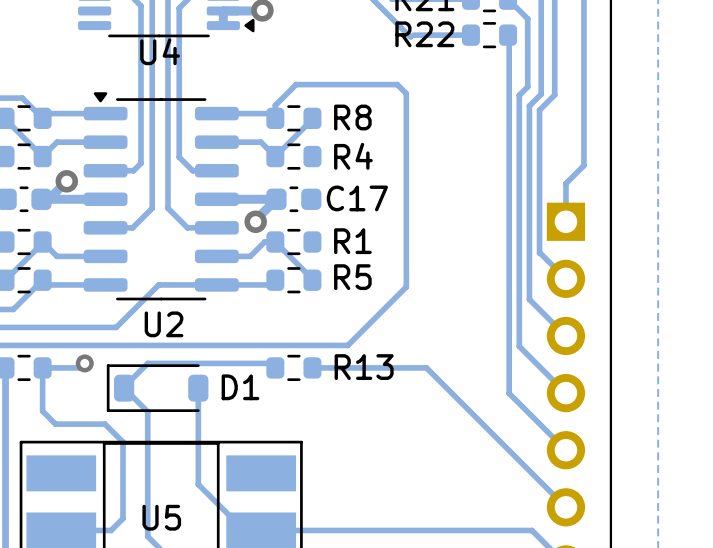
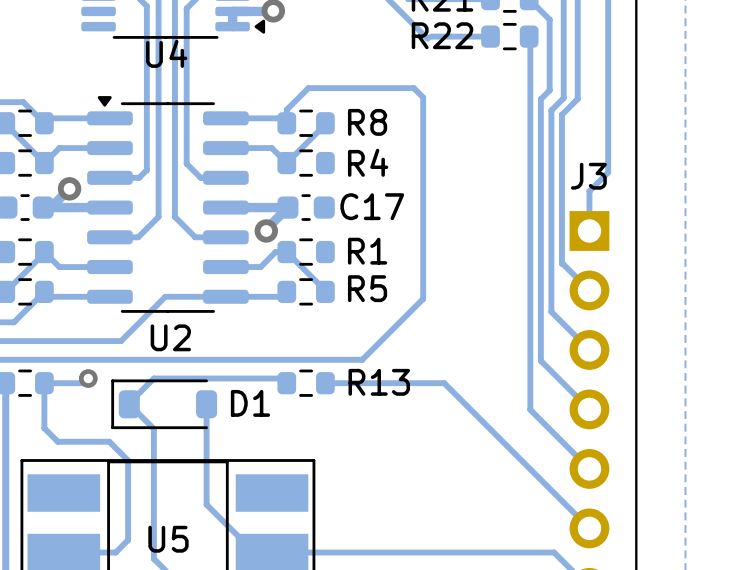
text: none -> J3 (588, 176)

